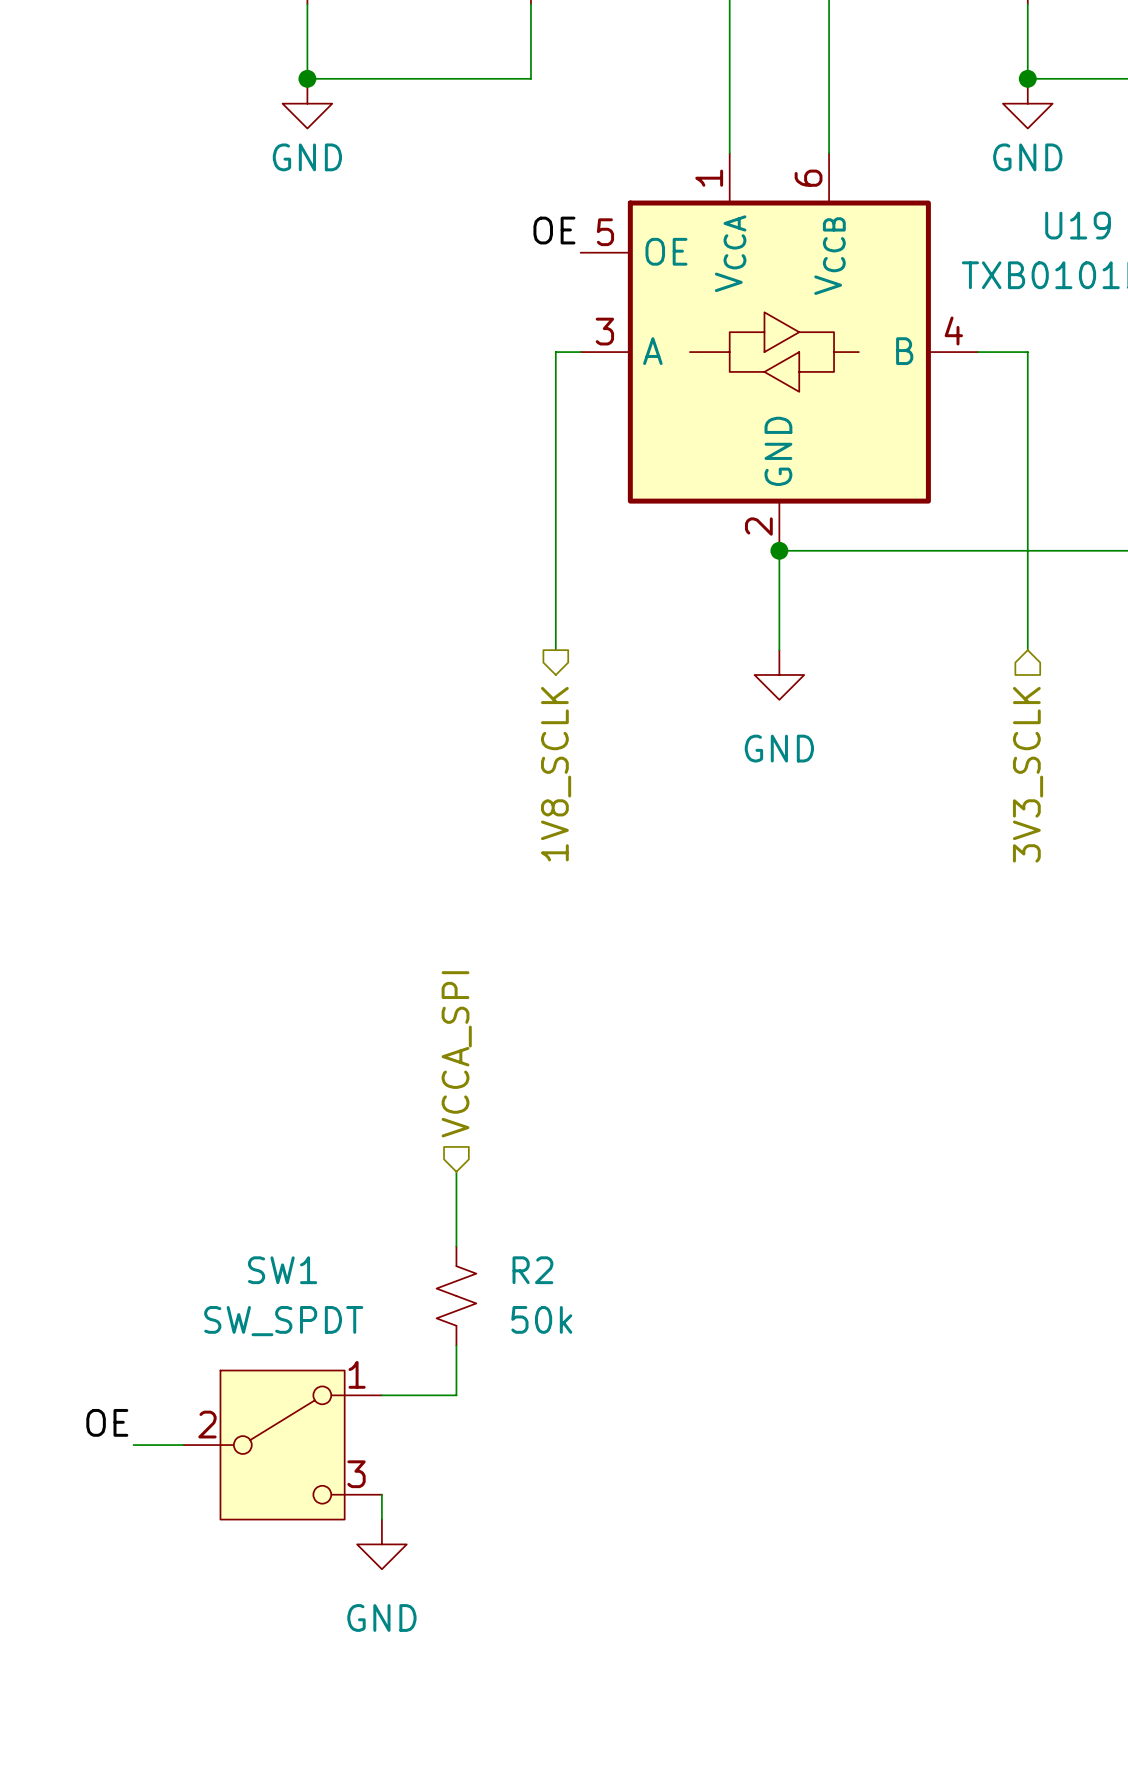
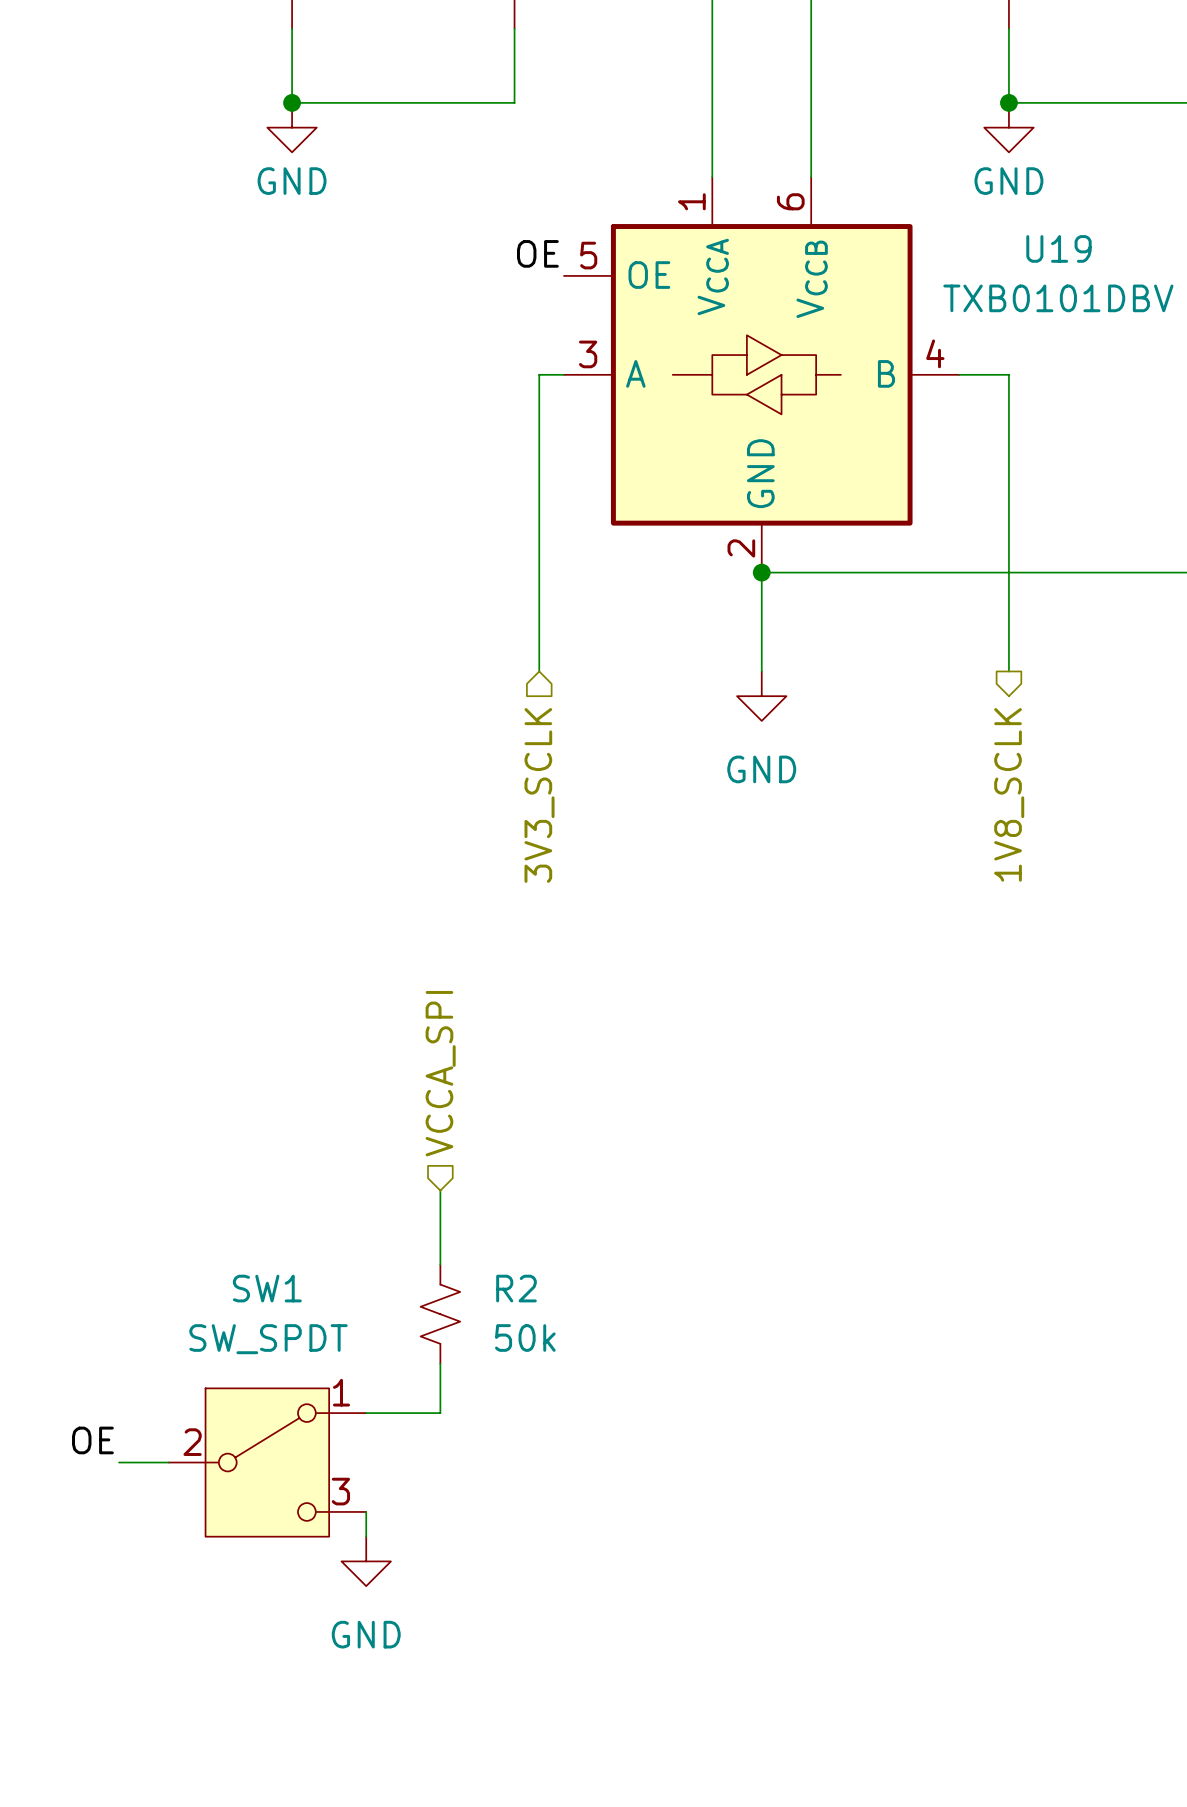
hierarchical label shape: output (556, 774) -> input (539, 795)
hierarchical label: 1V8_SCLK (556, 774) -> 3V3_SCLK (539, 795)
hierarchical label shape: input (1028, 774) -> output (1009, 794)
hierarchical label: 3V3_SCLK (1028, 774) -> 1V8_SCLK (1009, 794)

